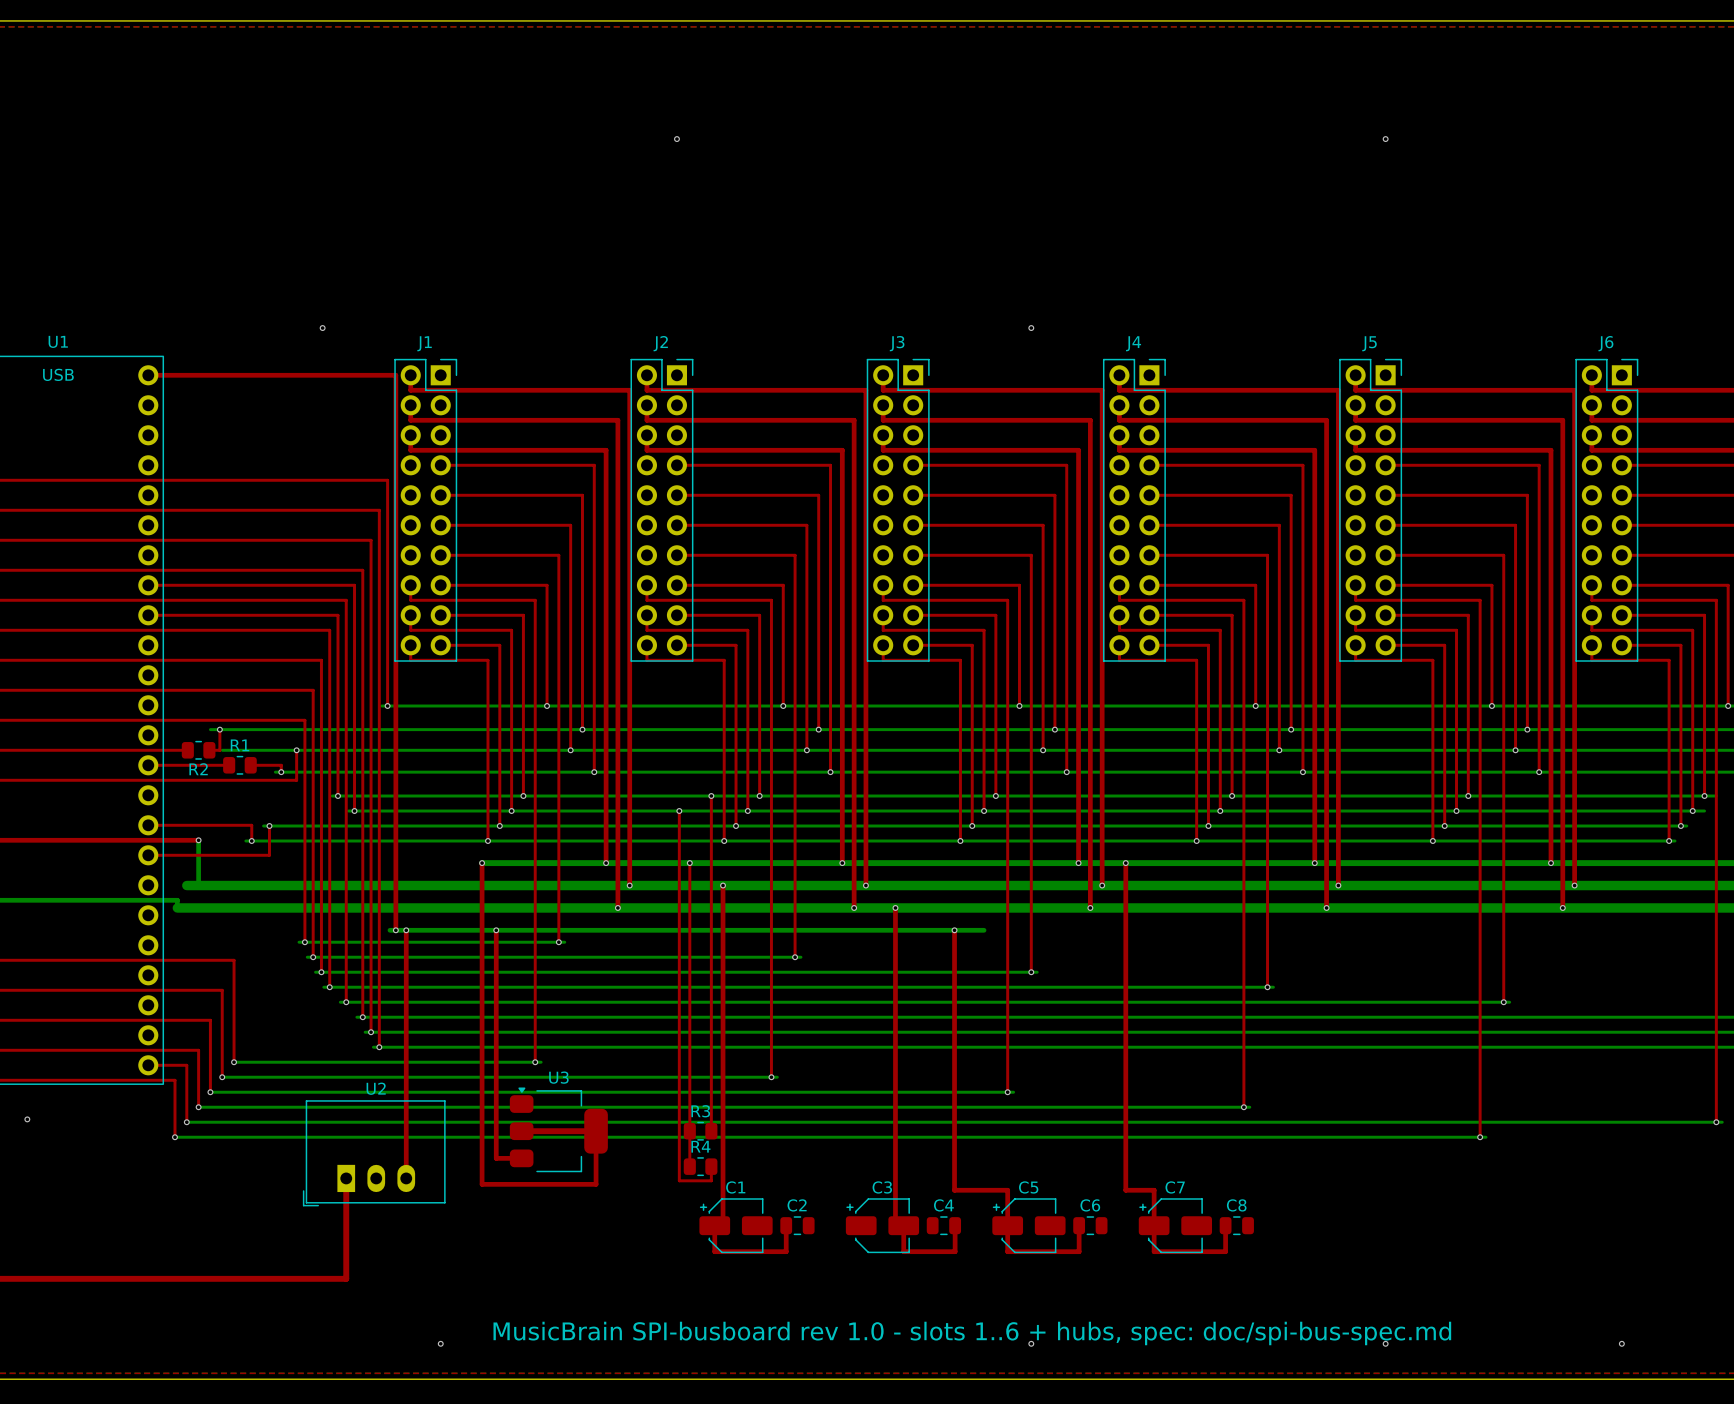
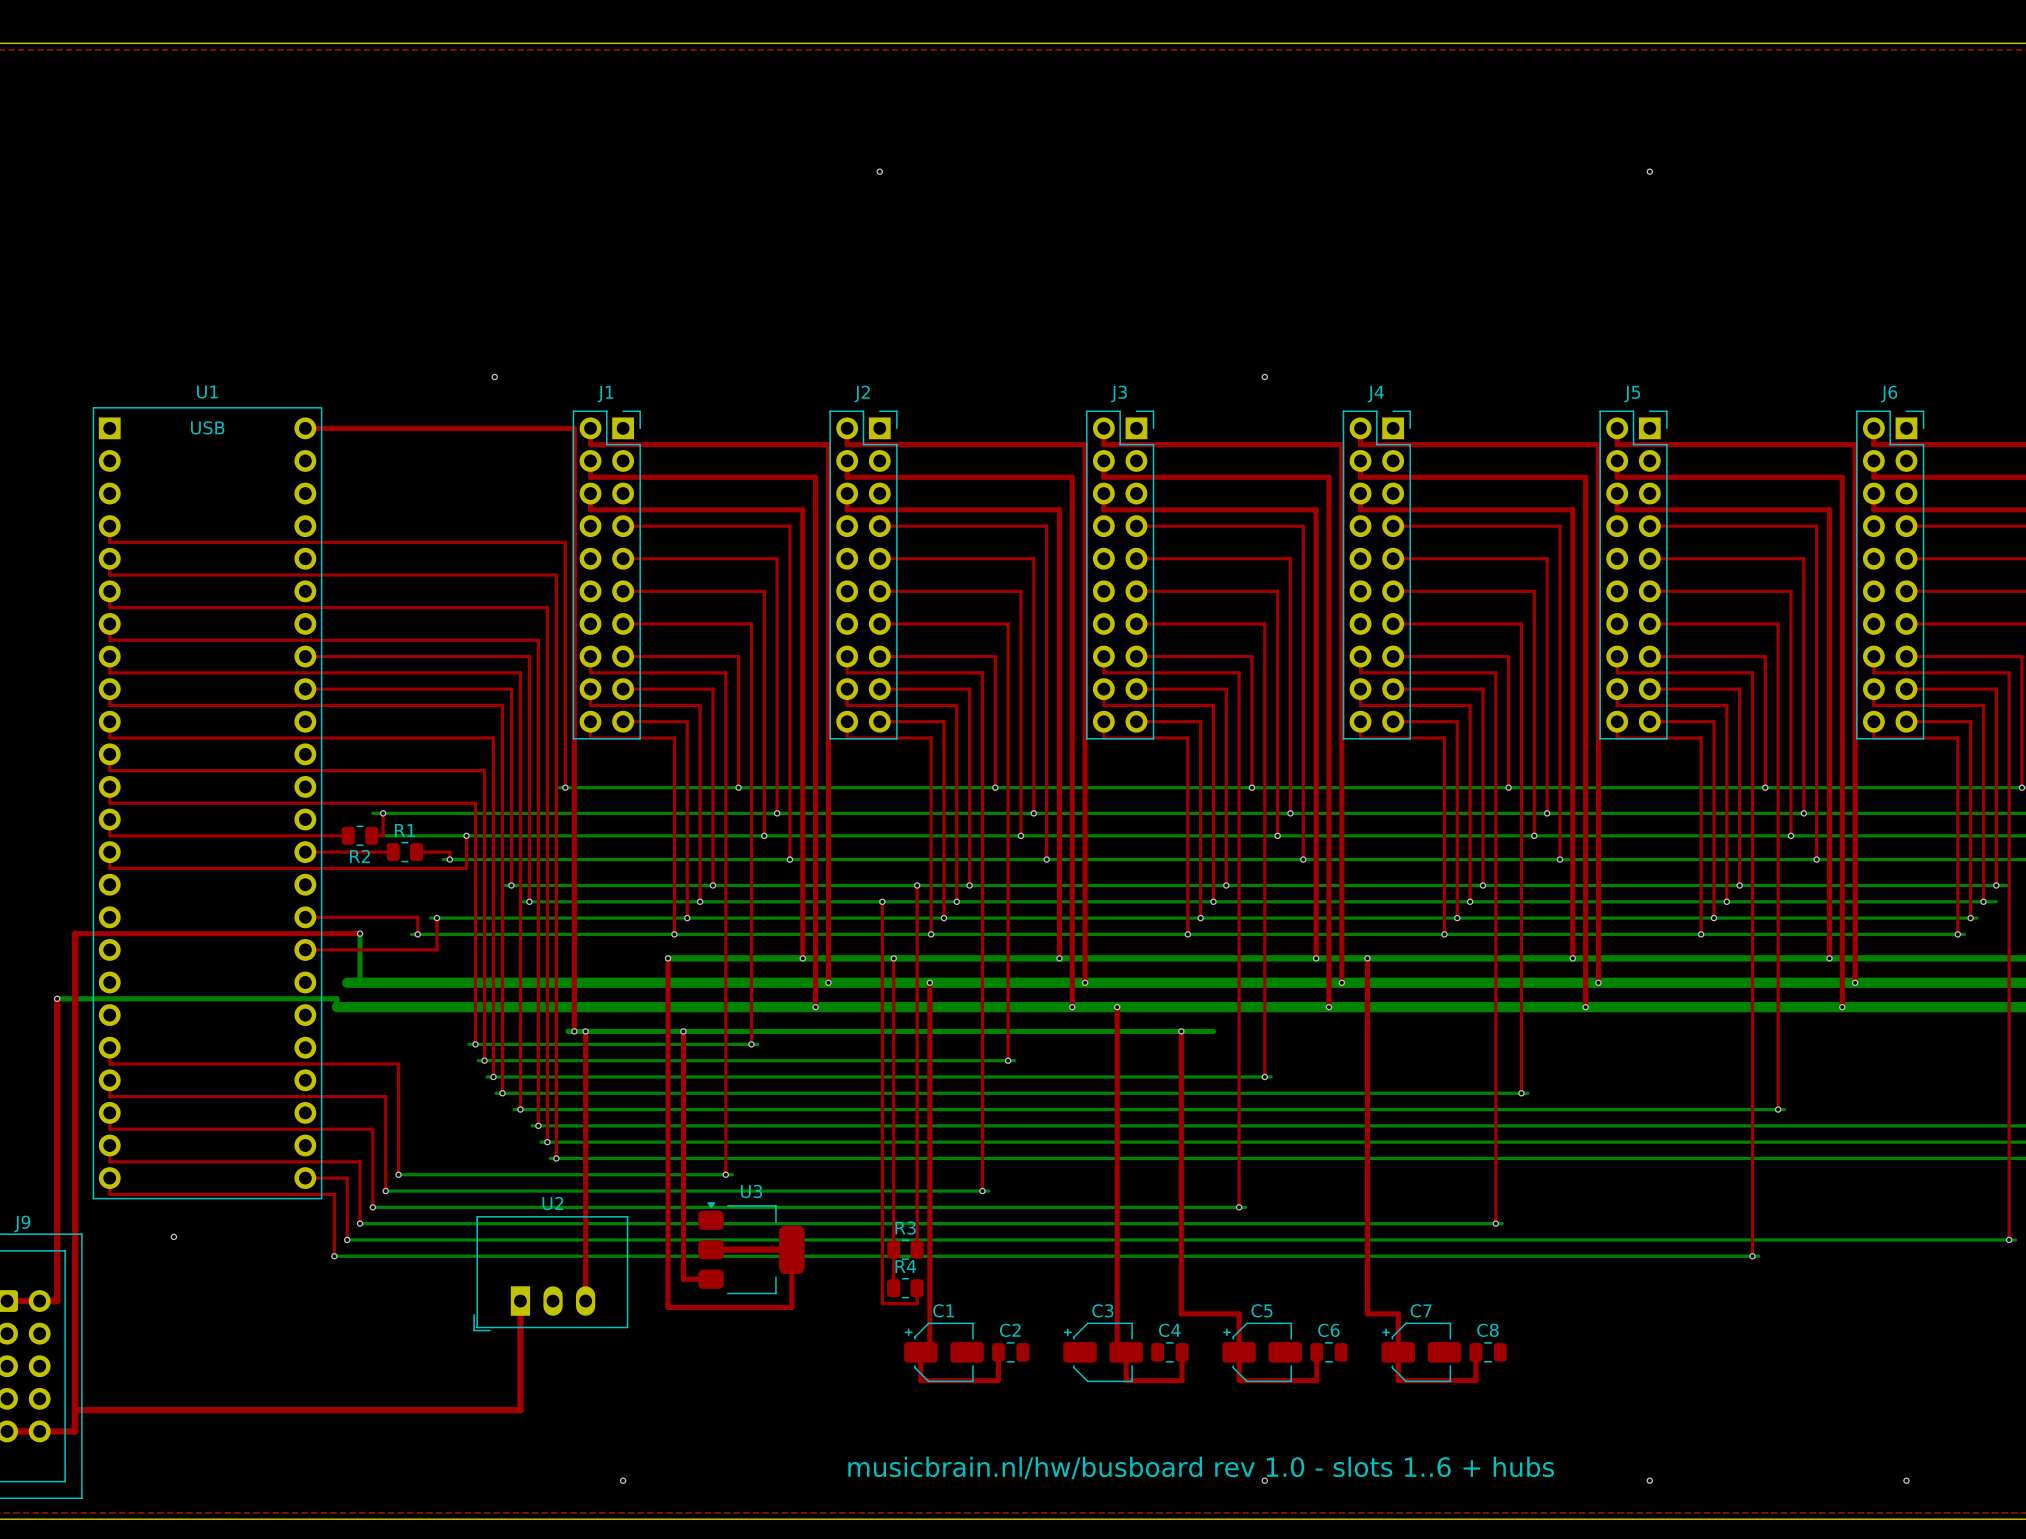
text: MusicBrain SPI-busboard rev 1.0 - slots 1..6 + hubs, spec: doc/spi-bus-spec.md (972, 1333) -> musicbrain.nl/hw/busboard rev 1.0 - slots 1..6 + hubs (1201, 1467)

